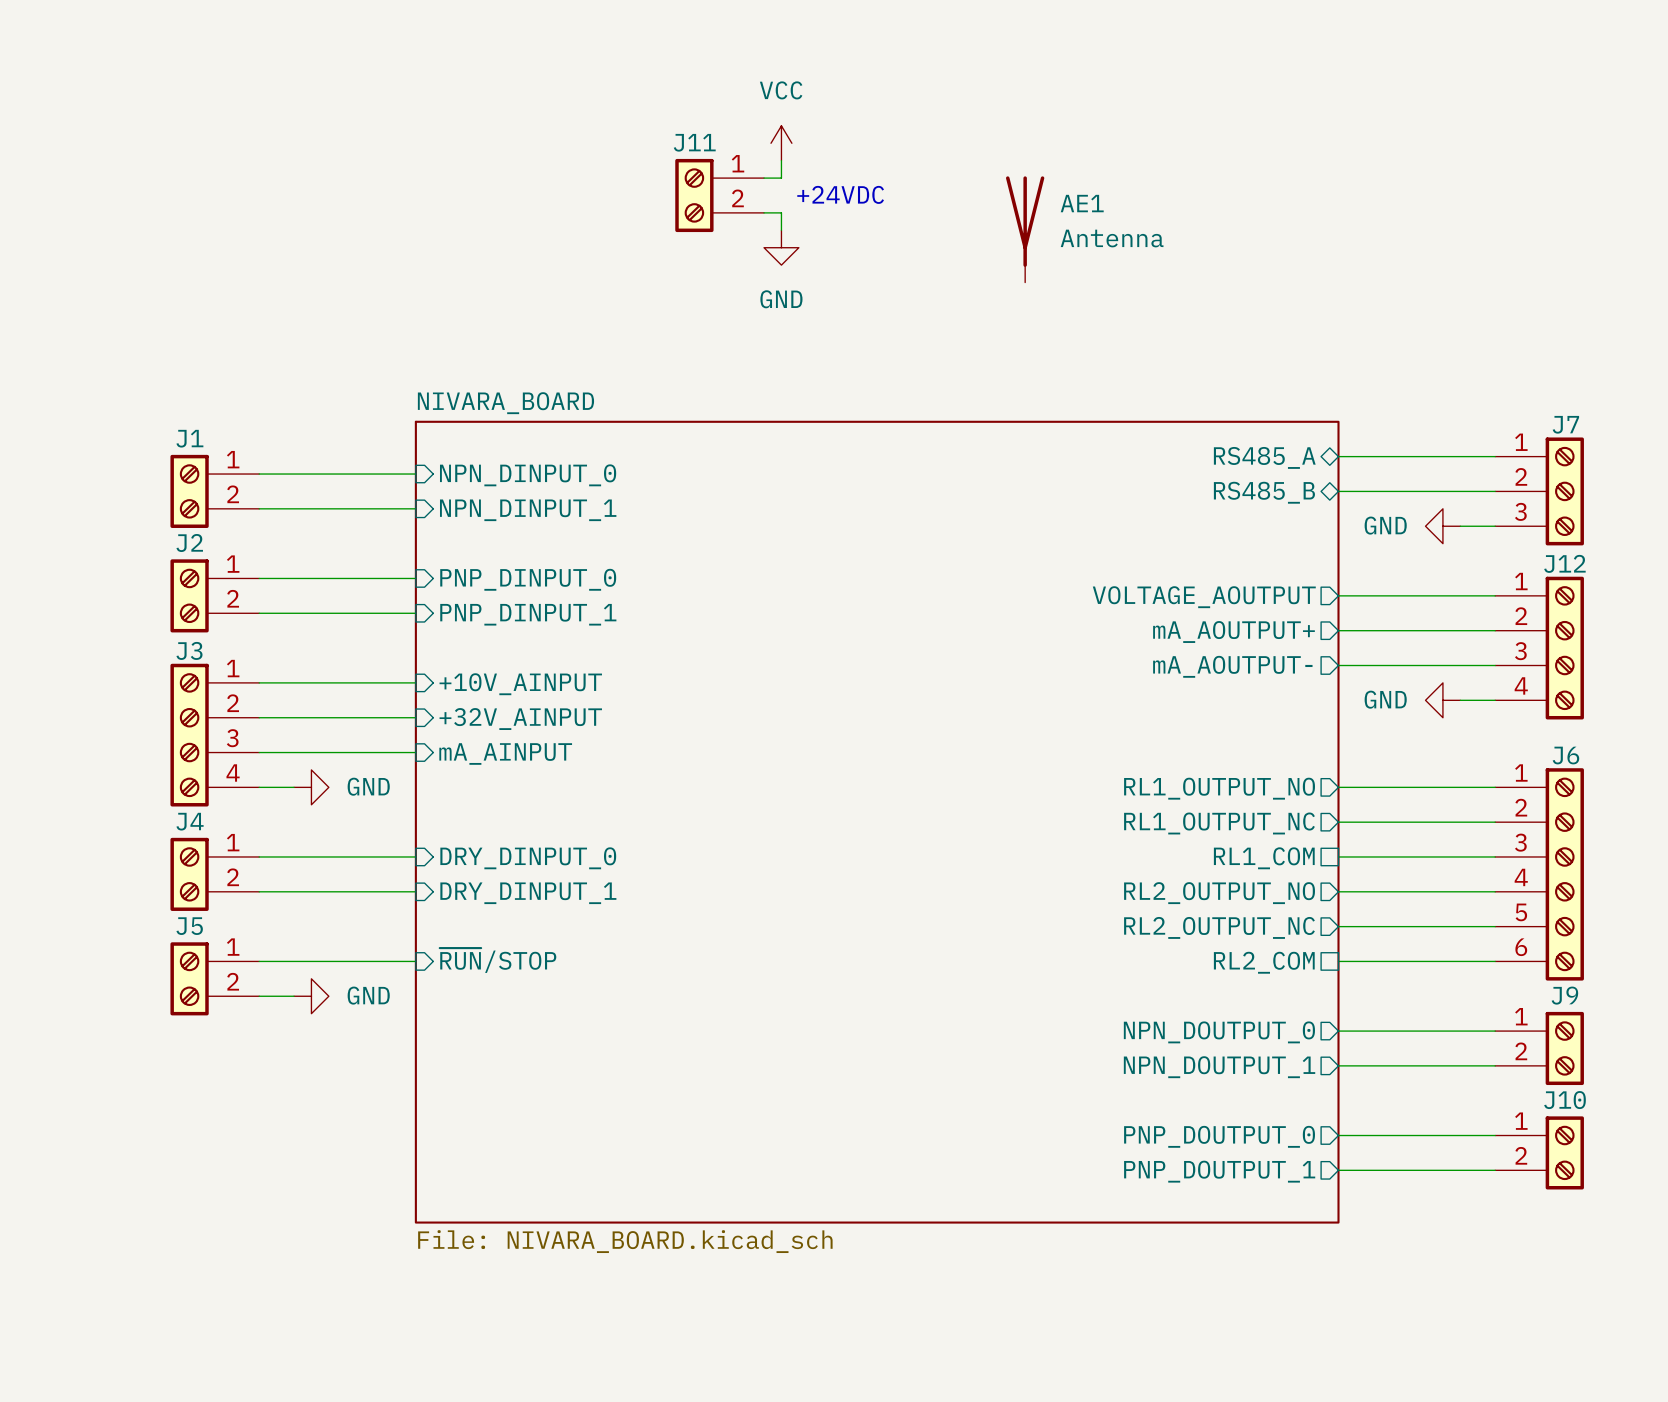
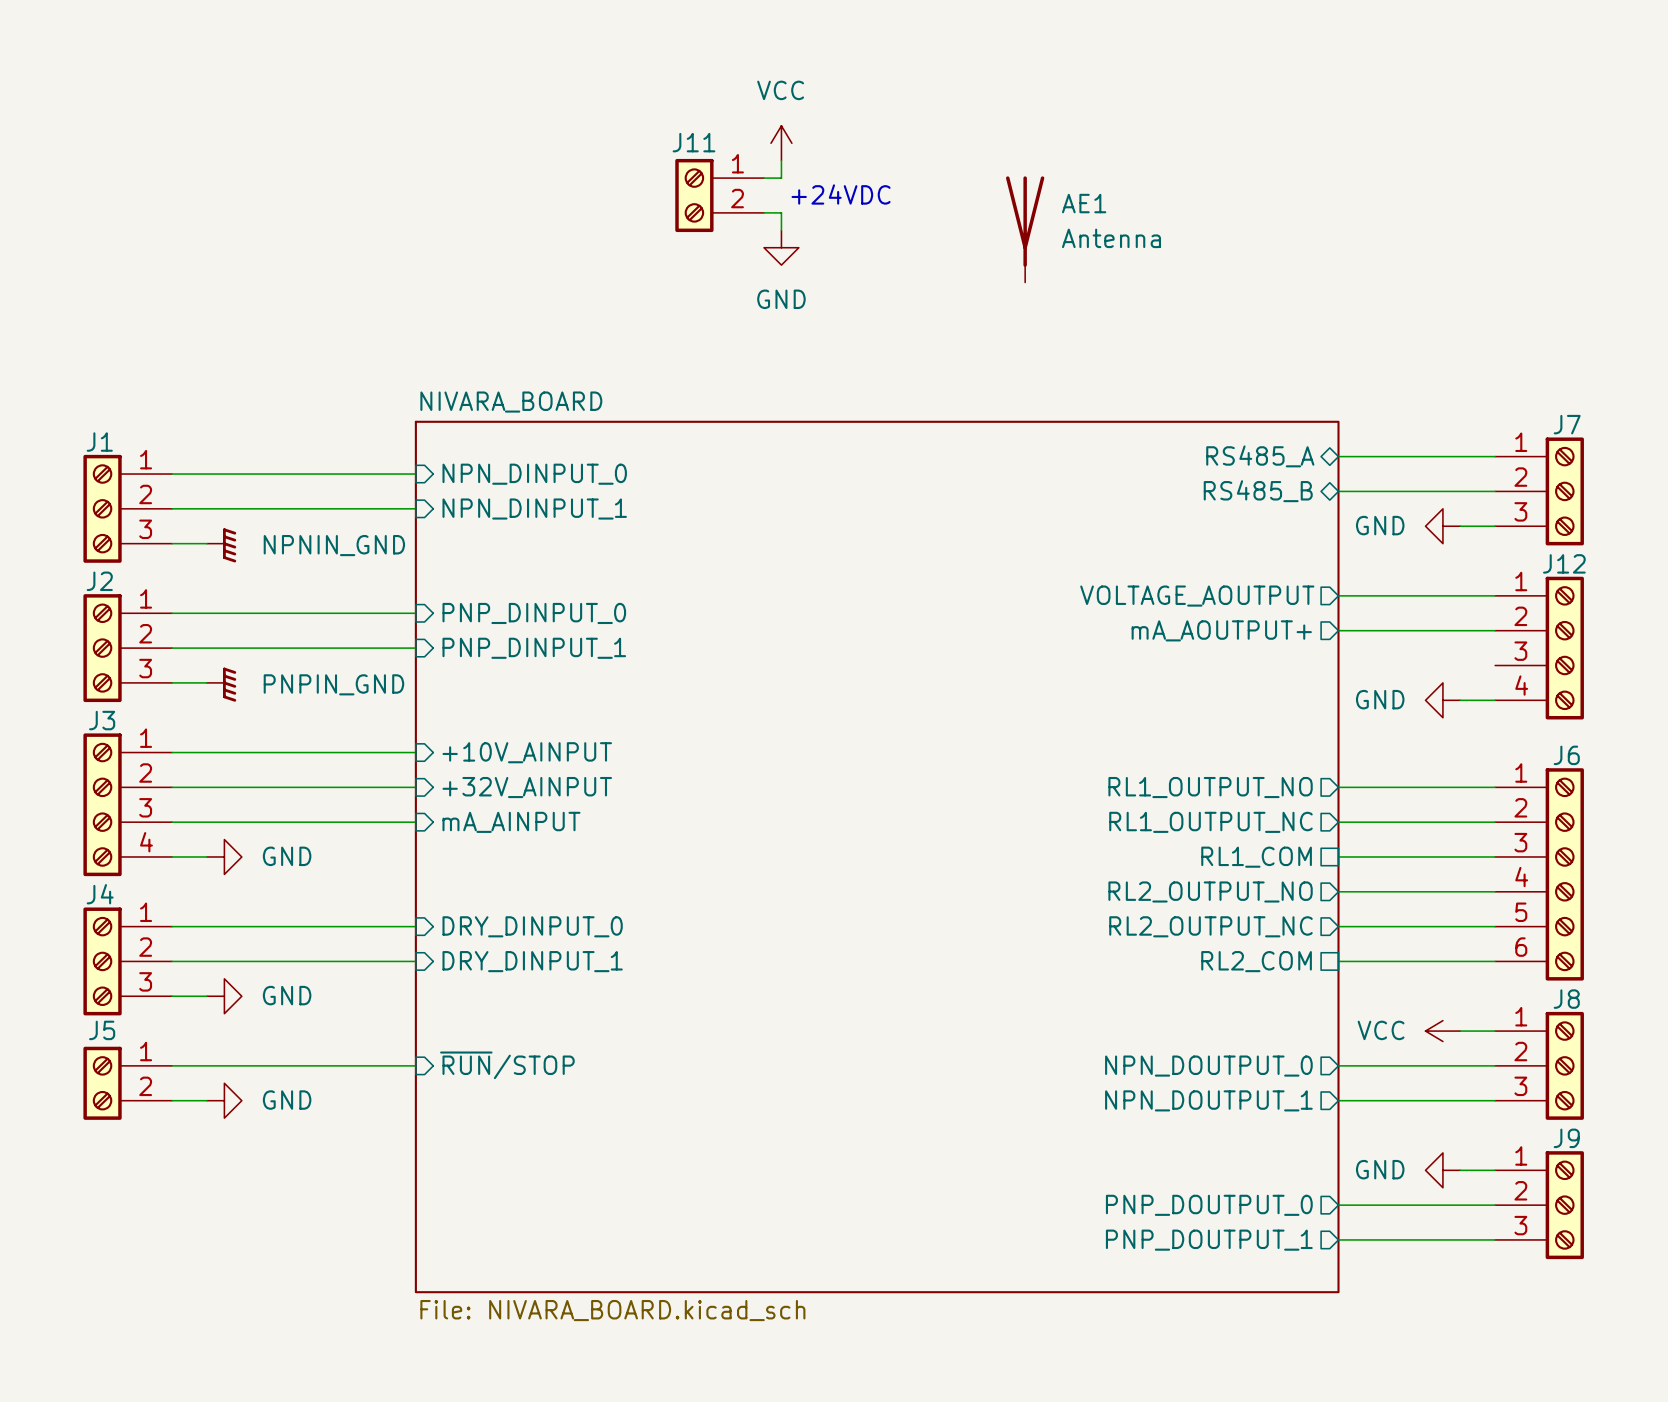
J1 symbol: [170, 454, 260, 528] -> [83, 454, 173, 563]
wire: none -> (172, 543) (206, 543)
power symbol: none -> NPNIN_GND (221, 545)
J2 symbol: [170, 559, 260, 633] -> [83, 594, 173, 703]
wire: (259, 578) (415, 578) -> none
sheet pin: PNP_DINPUT_0 (528, 579) -> none
sheet pin: PNP_DINPUT_1 (528, 614) -> PNP_DINPUT_0 (534, 613)
wire: none -> (172, 648) (415, 648)
sheet pin: none -> PNP_DINPUT_1 (534, 648)
wire: (1338, 665) (1495, 665) -> none
sheet pin: mA_AOUTPUT- (1232, 666) -> none
wire: (259, 682) (415, 682) -> none
power symbol: none -> PNPIN_GND (221, 684)
sheet pin: +10V_AINPUT (520, 684) -> none
wire: (259, 717) (415, 717) -> none
sheet pin position: +32V_AINPUT (520, 719) -> +32V_AINPUT (527, 787)
J3 position: (214, 735) -> (127, 804)
sheet pin: mA_AINPUT (505, 754) -> +10V_AINPUT (527, 752)
wire: none -> (294, 787) (415, 787)
power symbol: GND (311, 787) -> none
wire: none -> (172, 822) (415, 822)
sheet NIVARA_BOARD: File: NIVARA_BOARD.kicad_sch (877, 822) -> none
sheet pin: none -> mA_AINPUT (511, 822)
J4 symbol: [170, 837, 260, 911] -> [83, 907, 173, 1016]
power symbol: none -> GND (224, 856)
wire: (259, 856) (415, 856) -> none
sheet NIVARA_BOARD: none -> File: NIVARA_BOARD.kicad_sch (877, 856)
sheet pin position: DRY_DINPUT_0 (528, 858) -> DRY_DINPUT_0 (532, 926)
wire: (259, 891) (415, 891) -> none
sheet pin: DRY_DINPUT_1 (528, 893) -> none
wire: none -> (172, 926) (415, 926)
sheet pin: ~{RUN}/STOP (498, 960) -> DRY_DINPUT_1 (532, 961)
J5 position: (214, 978) -> (127, 1083)
power symbol: none -> GND (224, 996)
power symbol: GND (311, 996) -> none
J9 symbol: [1495, 1011, 1584, 1086] -> [1495, 1151, 1584, 1260]
wire: (1338, 1031) (1460, 1031) -> none
power symbol: none -> VCC (1442, 1031)
sheet pin: NPN_DOUTPUT_0 (1219, 1032) -> none
sheet pin: none -> ~{RUN}/STOP (507, 1065)
wire: none -> (172, 1065) (415, 1065)
J8: none -> (1539, 1065)
sheet pin: NPN_DOUTPUT_1 (1219, 1067) -> NPN_DOUTPUT_0 (1208, 1066)
wire: none -> (172, 1100) (206, 1100)
power symbol: none -> GND (224, 1100)
sheet pin: none -> NPN_DOUTPUT_1 (1208, 1100)
wire: (1338, 1135) (1495, 1135) -> (1338, 1100) (1495, 1100)
sheet pin position: PNP_DOUTPUT_0 (1219, 1136) -> PNP_DOUTPUT_0 (1209, 1205)
J10: (1539, 1152) -> none
wire: (1338, 1170) (1460, 1170) -> none
power symbol: none -> GND (1442, 1170)
sheet pin position: PNP_DOUTPUT_1 (1219, 1171) -> PNP_DOUTPUT_1 (1209, 1240)
wire: none -> (1338, 1205) (1495, 1205)
wire: none -> (1338, 1239) (1495, 1239)

